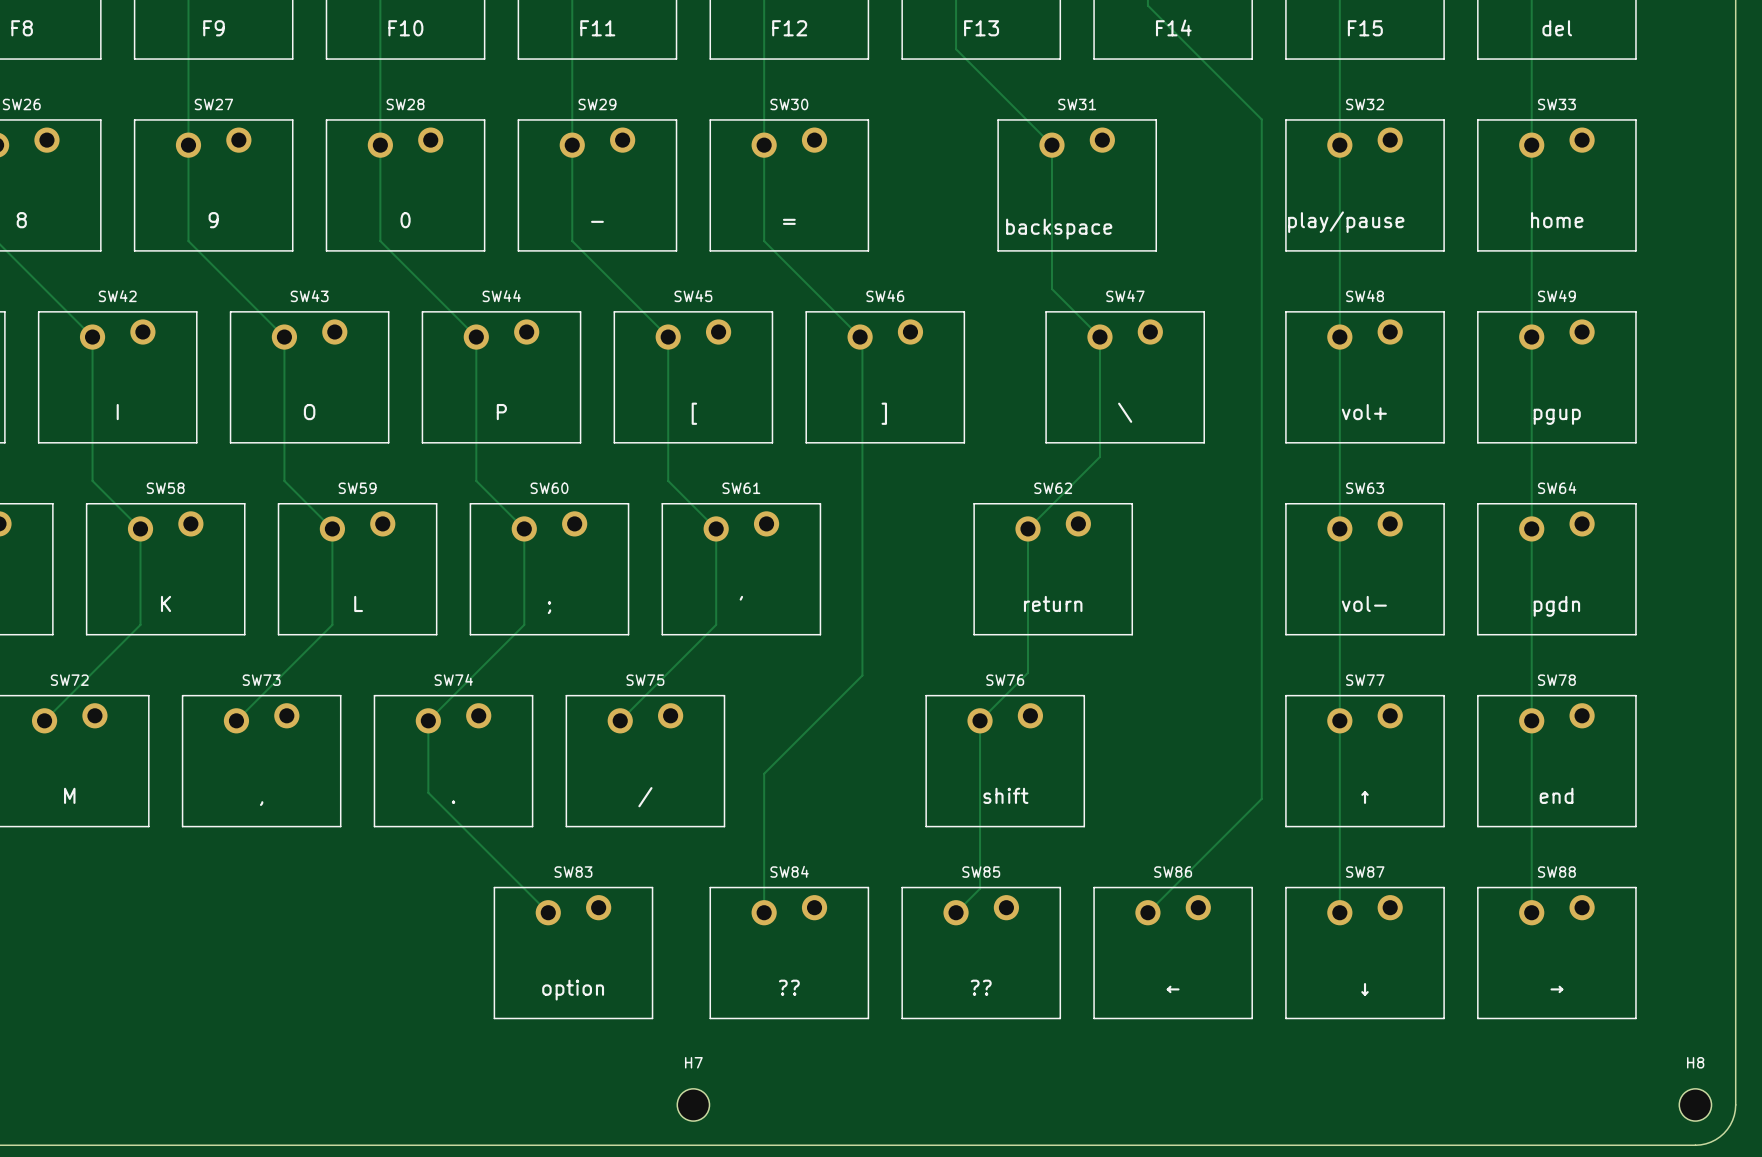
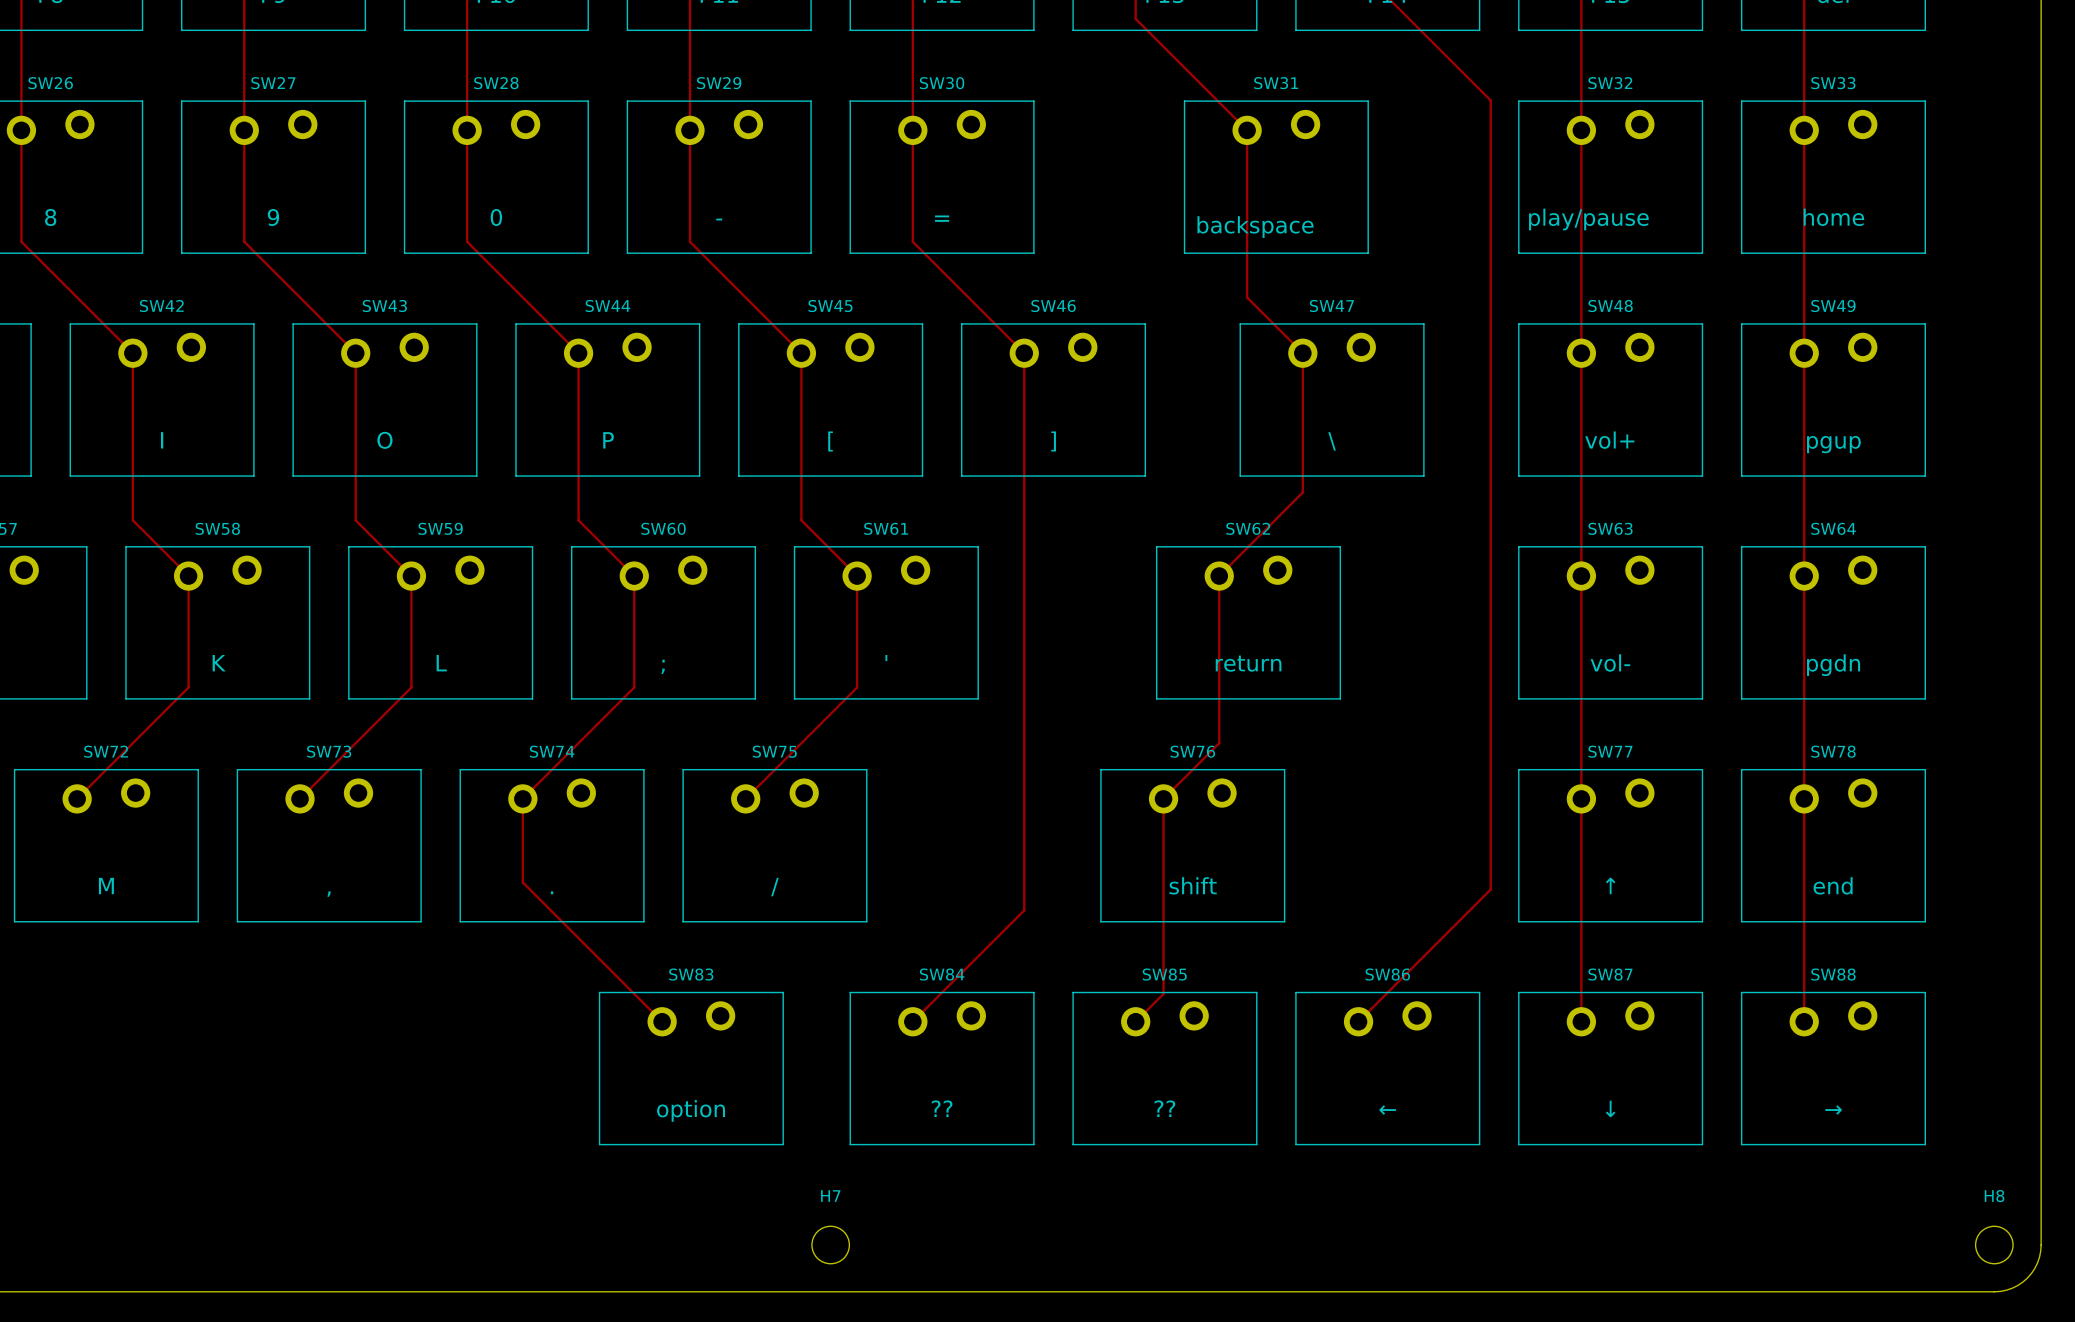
track: (860, 337) (862, 339) (862, 675) (764, 773) (764, 912) -> (1024, 353) (1024, 910) (912, 1021)

